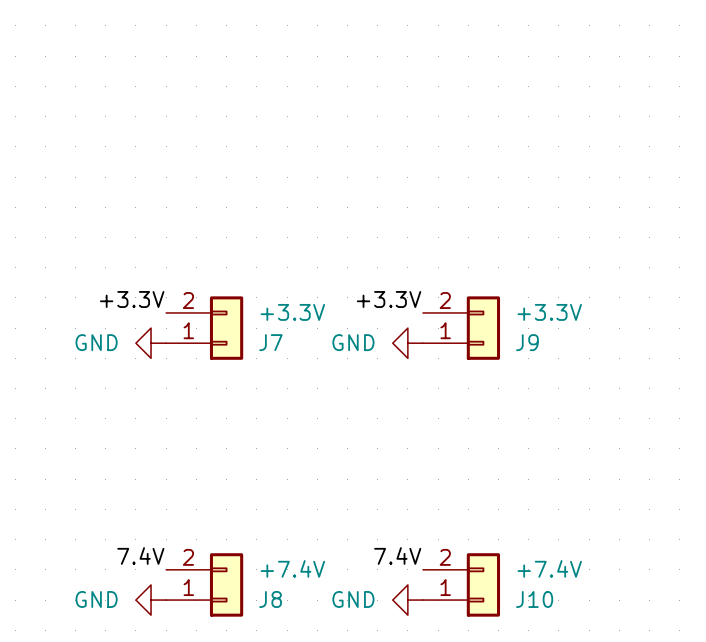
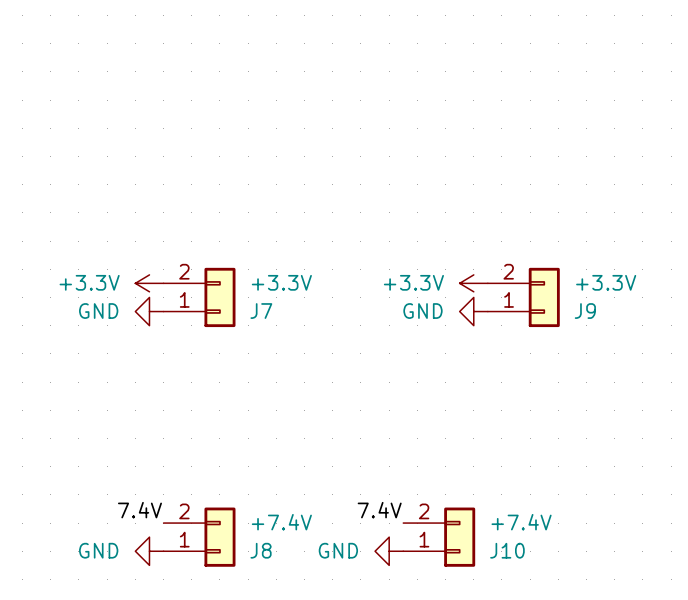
label: +3.3V (132, 299) -> none
label: +3.3V (389, 299) -> none
power symbol: none -> +3.3V (149, 283)
power symbol: none -> +3.3V (473, 283)
J9 position: (461, 328) -> (523, 297)
power symbol position: GND (407, 343) -> GND (473, 311)

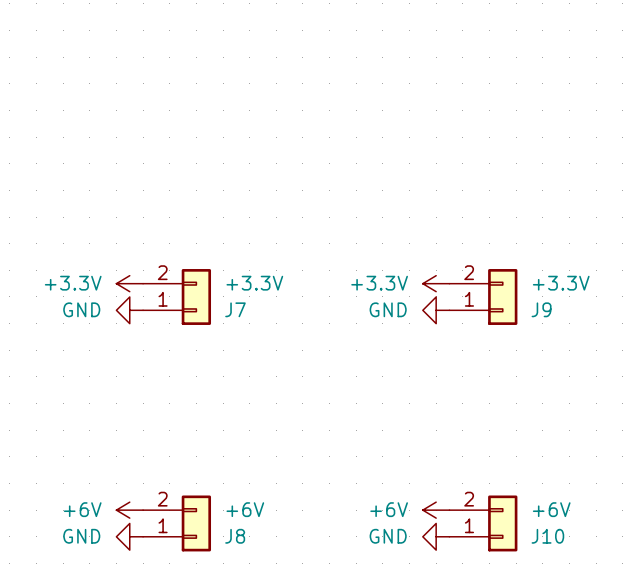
label: 7.4V (139, 510) -> none
label: 7.4V (379, 510) -> none
J8 value: +7.4V (281, 522) -> +6V (245, 509)
J10 value: +7.4V (521, 522) -> +6V (551, 509)
power symbol: none -> +6V (129, 510)
power symbol: none -> +6V (436, 510)
J10 position: (439, 537) -> (483, 523)
power symbol position: GND (389, 551) -> GND (436, 536)

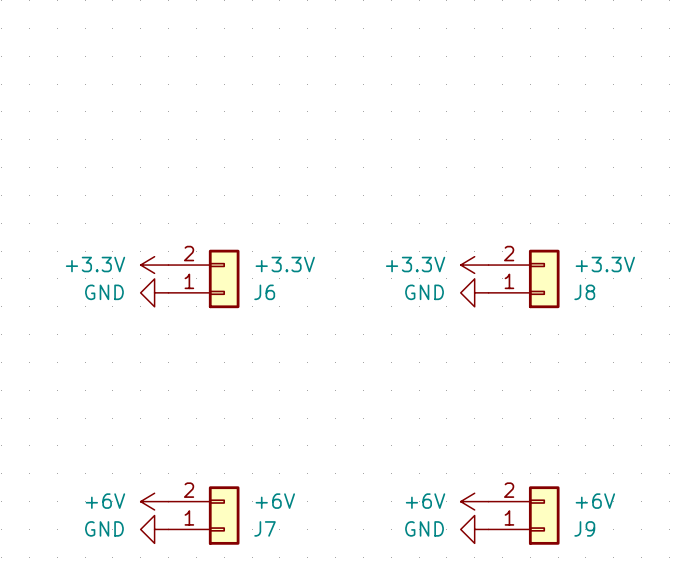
J7 name: J7 (235, 309) -> J6 (264, 292)
J9 name: J9 (541, 309) -> J8 (584, 292)
J8 name: J8 (235, 536) -> J7 (265, 528)
J10 name: J10 (547, 536) -> J9 (584, 528)

